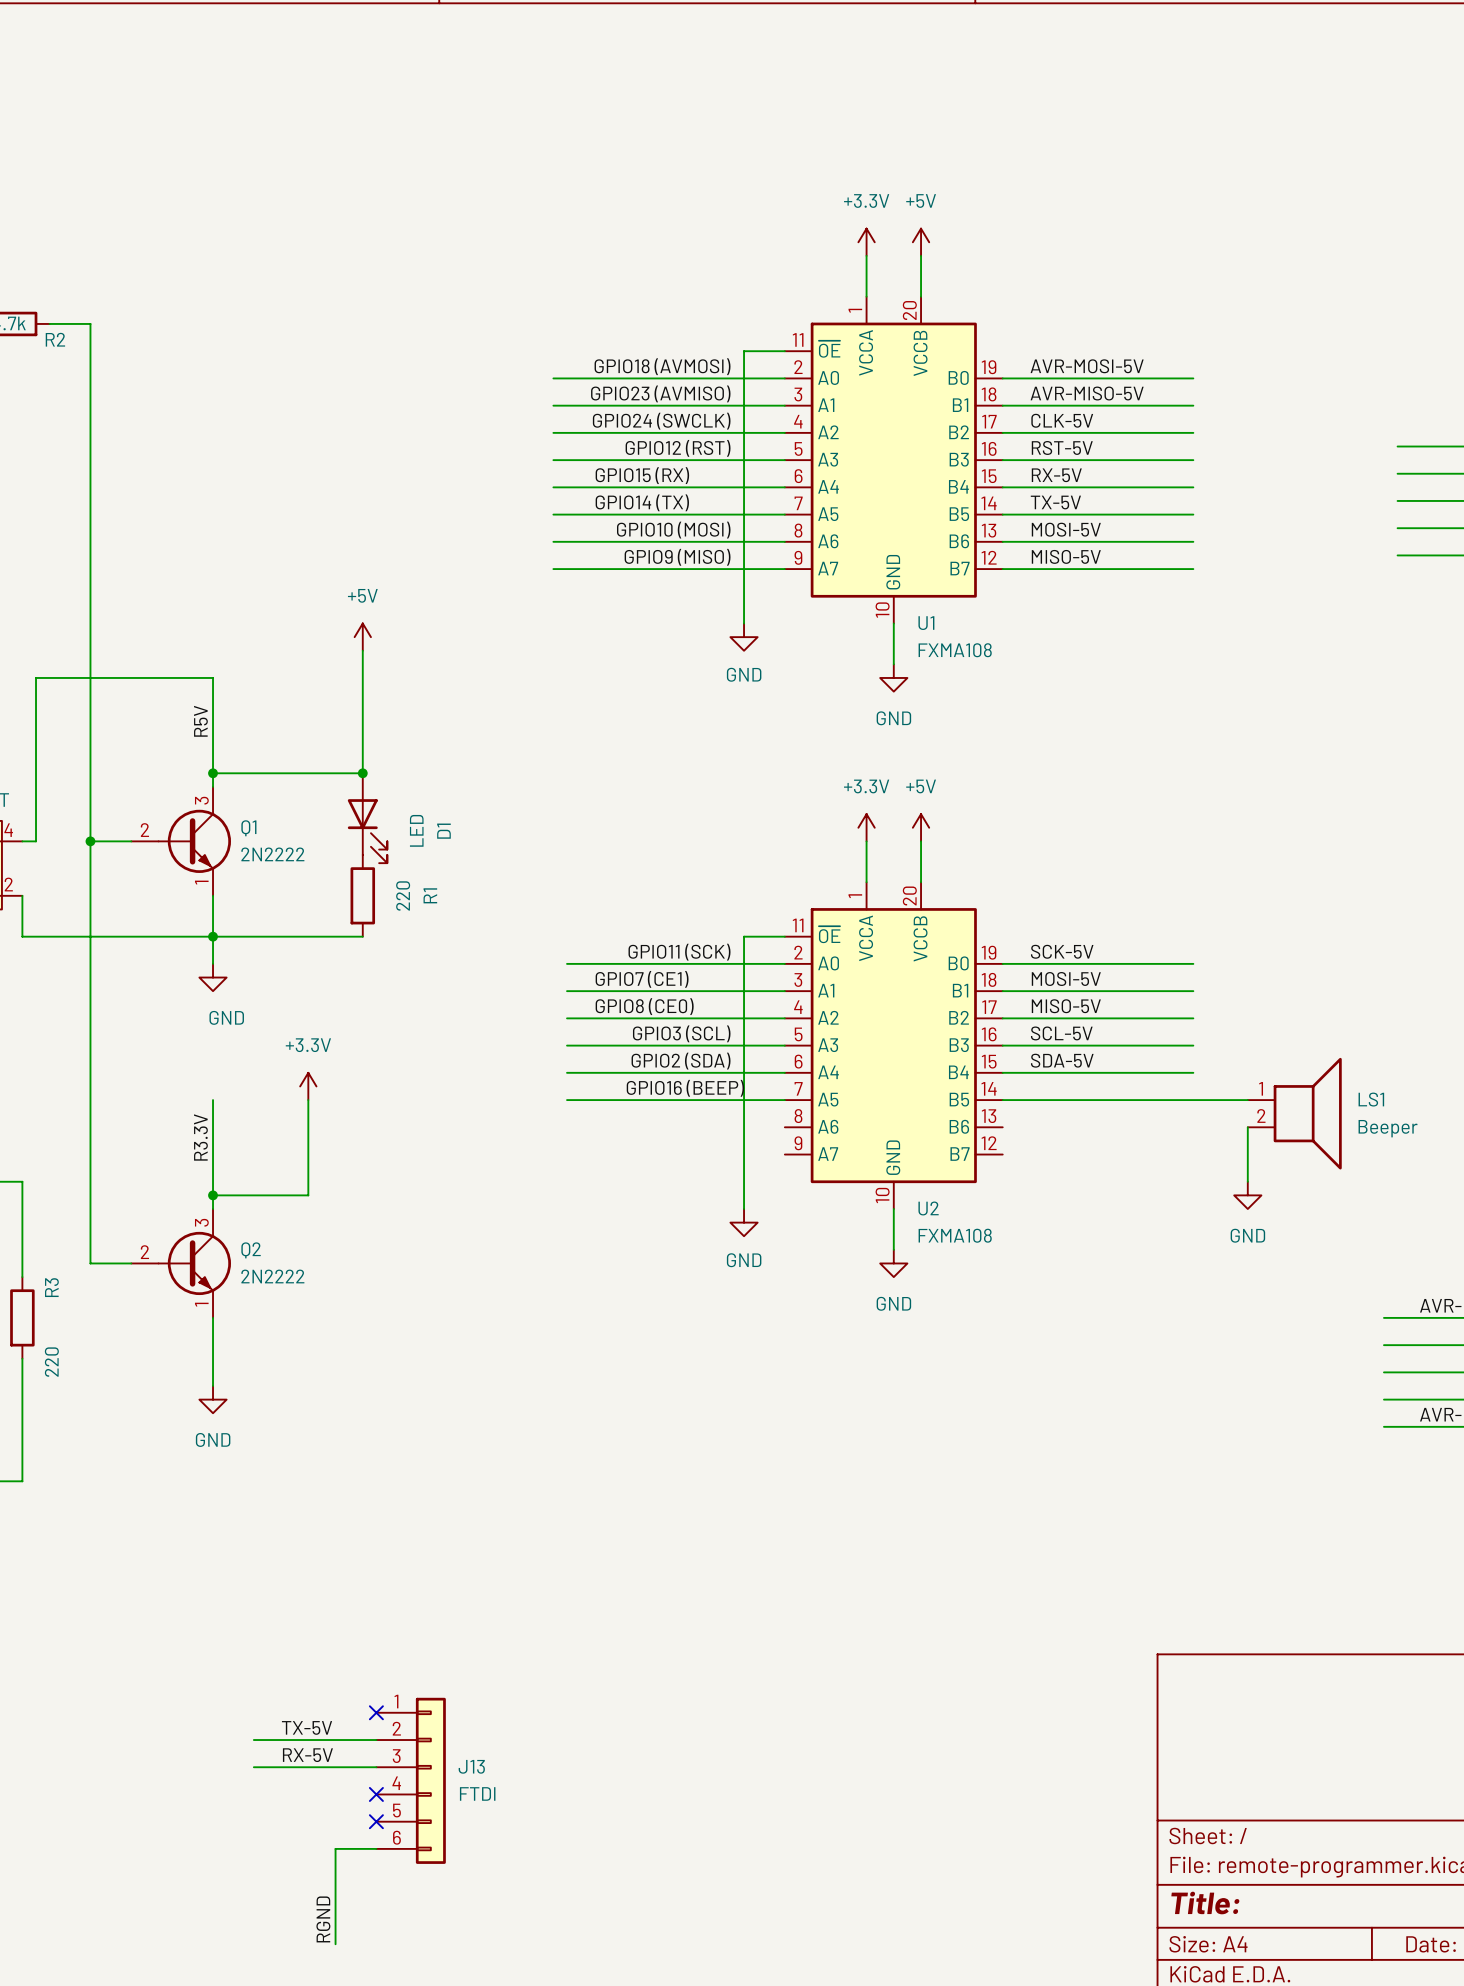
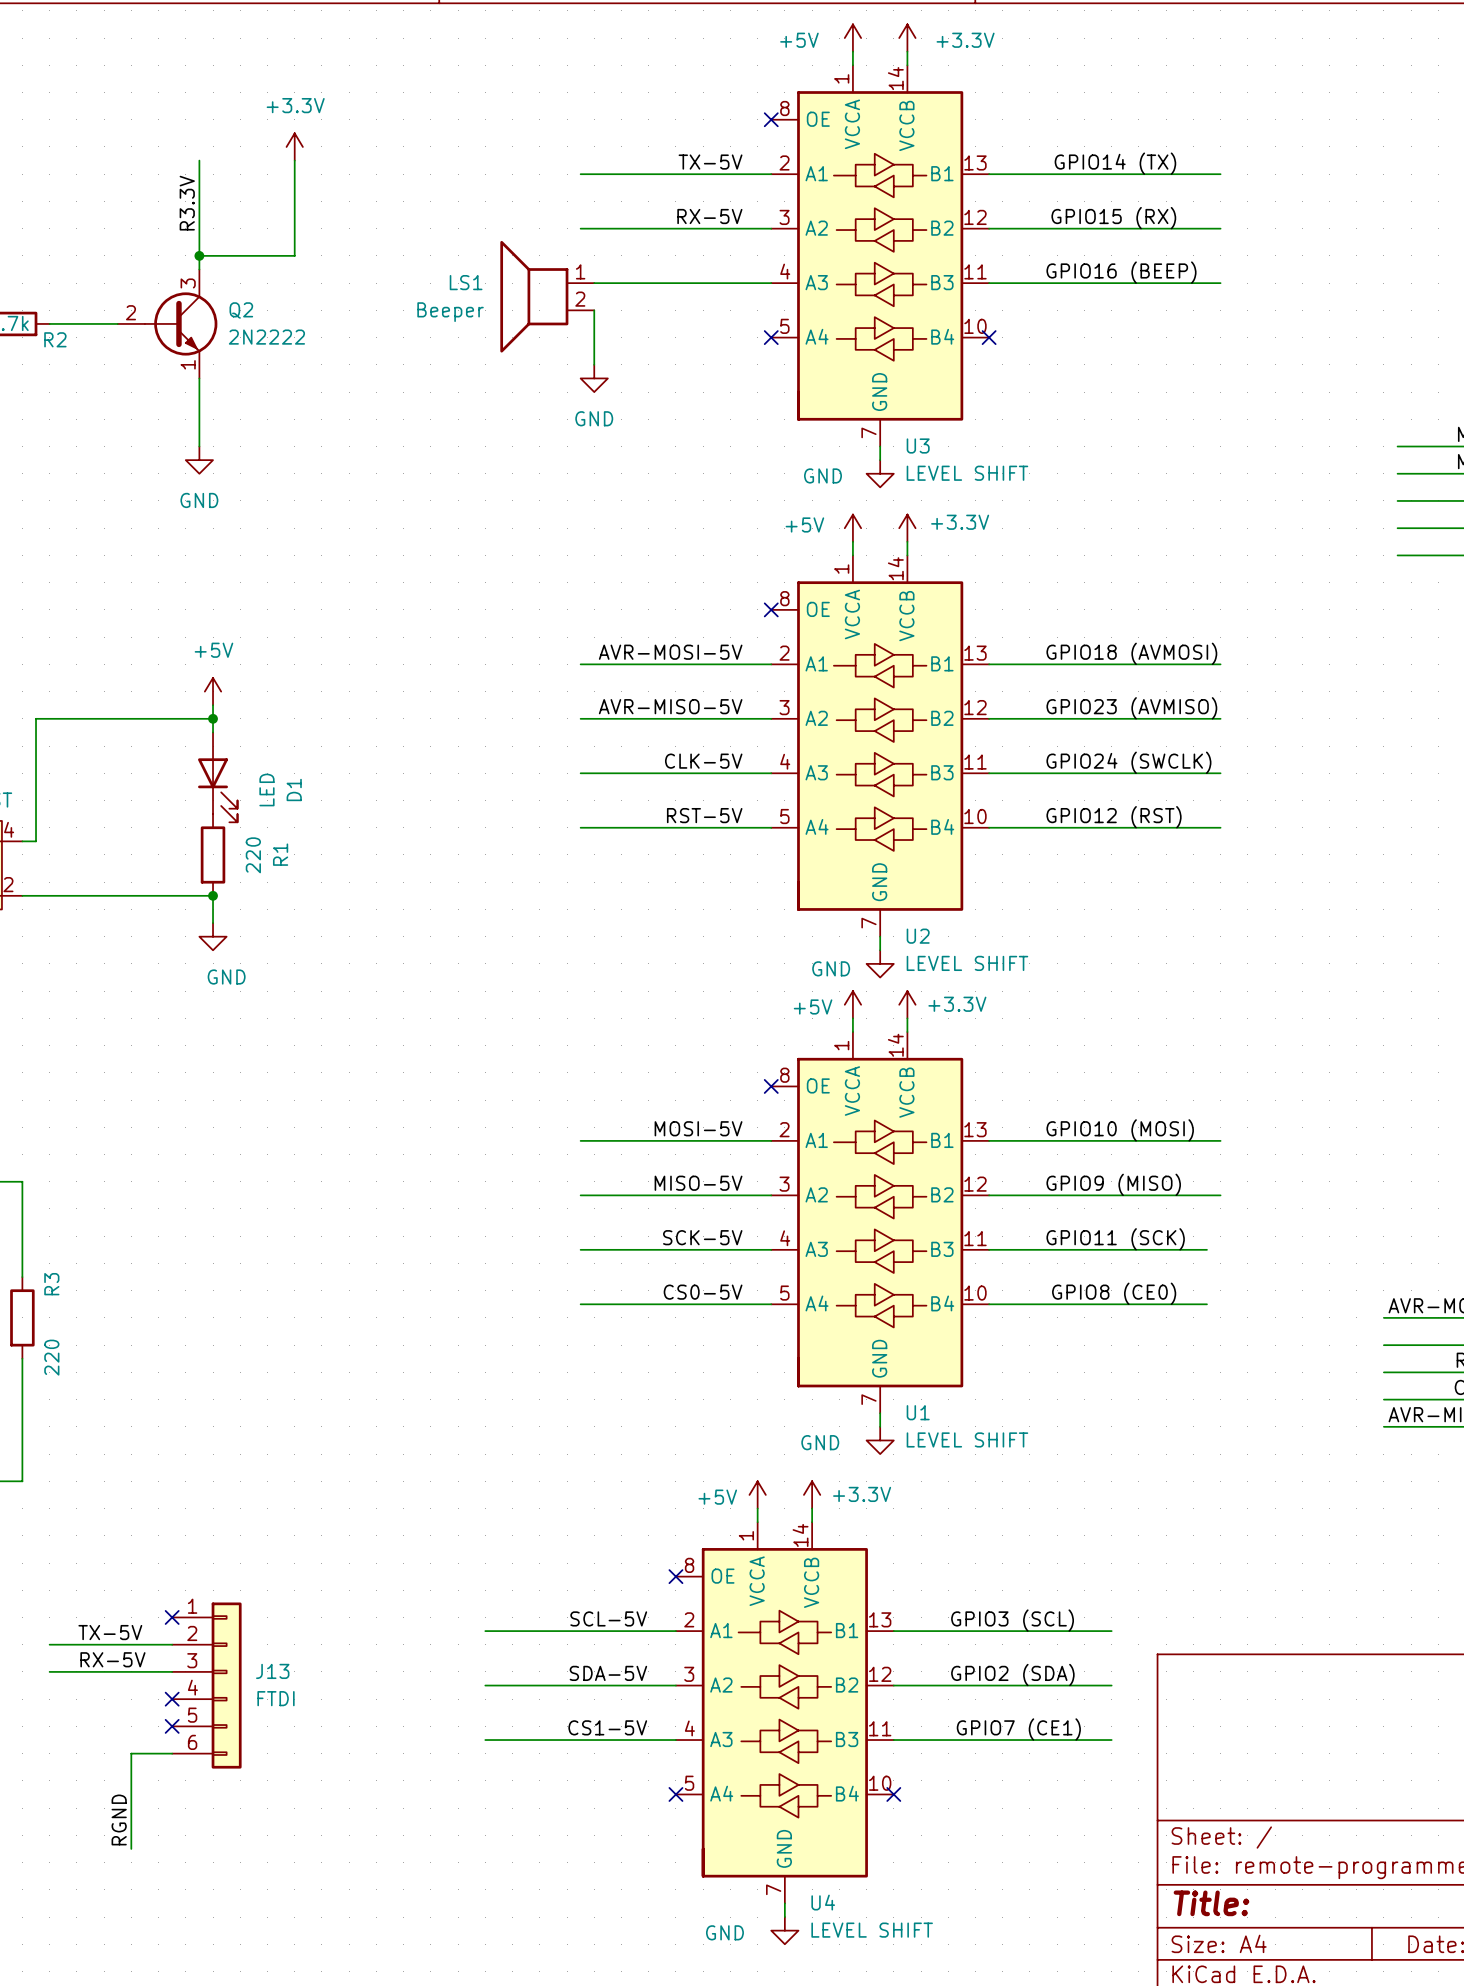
power symbol: none -> +5V (852, 38)
power symbol: none -> +3.3V (907, 38)
wire: none -> (852, 51) (852, 65)
wire: none -> (907, 51) (907, 65)
no-connect mark: none -> (771, 119)
power symbol: none -> +3.3V (294, 146)
wire: none -> (199, 160) (199, 269)
wire: none -> (294, 160) (294, 255) (199, 255)
label: none -> TX-5V (710, 162)
label: none -> GPIO14 (TX) (1115, 163)
wire: none -> (580, 174) (771, 174)
wire: none -> (989, 174) (1220, 174)
label: none -> R3.3V (187, 203)
label: none -> RX-5V (709, 216)
label: none -> GPIO15 (RX) (1113, 218)
wire: none -> (580, 228) (771, 228)
wire: none -> (989, 228) (1220, 228)
power symbol: +3.3V (866, 242) -> none
power symbol: +5V (921, 242) -> none
junction: none -> (199, 255)
U3: none -> LEVEL SHIFT (880, 255)
label: none -> GPIO16 (BEEP) (1121, 272)
wire: none -> (594, 283) (771, 283)
wire: none -> (989, 283) (1220, 283)
U1 symbol: [784, 296, 1003, 624] -> [771, 1031, 990, 1414]
wire: none -> (594, 310) (594, 364)
wire: (90, 323) (90, 1263) (131, 1263) -> (90, 323) (117, 323)
no-connect mark: none -> (771, 337)
no-connect mark: none -> (989, 337)
wire: (784, 351) (744, 351) (744, 623) -> none
label: GPIO18 (AVMOSI) (662, 366) -> none
label: AVR-MOSI-5V (1087, 366) -> none
wire: none -> (199, 378) (199, 446)
wire: (553, 378) (784, 378) -> none
power symbol: none -> GND (594, 378)
wire: (1002, 378) (1193, 378) -> none
label: GPIO23 (AVMISO) (660, 393) -> none
label: AVR-MISO-5V (1087, 393) -> none
wire: (553, 405) (784, 405) -> none
wire: (1002, 405) (1193, 405) -> none
label: CLK-5V (1062, 420) -> none
label: GPIO24 (SWCLK) (661, 421) -> none
wire: (553, 432) (784, 432) -> none
wire: (1002, 432) (1193, 432) -> none
label: RST-5V (1062, 447) -> none
label: GPIO12 (RST) (678, 448) -> none
power symbol: none -> GND (199, 460)
wire: (553, 460) (784, 460) -> none
wire: (1002, 460) (1193, 460) -> none
power symbol: none -> GND (880, 473)
label: GPIO15 (RX) (642, 475) -> none
label: RX-5V (1056, 475) -> none
wire: (553, 487) (784, 487) -> none
wire: (1002, 487) (1193, 487) -> none
label: GPIO14 (TX) (642, 502) -> none
label: TX-5V (1055, 502) -> none
wire: (553, 514) (784, 514) -> none
wire: (1002, 514) (1193, 514) -> none
power symbol: none -> +5V (852, 528)
power symbol: none -> +3.3V (907, 528)
label: MOSI-5V (1066, 529) -> none
label: GPIO10 (MOSI) (673, 530) -> none
wire: (553, 541) (784, 541) -> none
wire: (1002, 541) (1193, 541) -> none
label: MISO-5V (1066, 556) -> none
label: GPIO9 (MISO) (677, 557) -> none
wire: (553, 569) (784, 569) -> none
wire: (1002, 569) (1193, 569) -> none
no-connect mark: none -> (771, 609)
U1 name position: U1 (926, 623) -> U1 (918, 1412)
power symbol position: +5V (362, 637) -> +5V (213, 691)
power symbol: GND (744, 637) -> none
wire: (362, 650) (362, 773) (213, 773) -> none
U1 value: FXMA108 (955, 650) -> LEVEL SHIFT (967, 1439)
label: none -> AVR-MOSI-5V (670, 652)
label: none -> GPIO18 (AVMOSI) (1131, 653)
wire: none -> (580, 664) (771, 664)
wire: none -> (989, 664) (1220, 664)
power symbol: GND (893, 677) -> none
wire: (213, 705) (213, 677) (36, 677) (36, 718) -> (213, 718) (36, 718)
label: none -> AVR-MISO-5V (670, 706)
label: none -> GPIO23 (AVMISO) (1131, 708)
wire: none -> (580, 718) (771, 718)
wire: none -> (989, 718) (1220, 718)
label: R5V (200, 721) -> none
label: none -> CLK-5V (703, 761)
label: none -> GPIO24 (SWCLK) (1128, 762)
junction position: (213, 773) -> (213, 718)
junction: (362, 773) -> none
wire: none -> (580, 773) (771, 773)
wire: none -> (989, 773) (1220, 773)
label: none -> RST-5V (704, 815)
label: none -> GPIO12 (RST) (1114, 817)
D1 position: (367, 818) -> (217, 777)
wire: none -> (580, 827) (771, 827)
power symbol: +3.3V (866, 827) -> none
power symbol: +5V (921, 827) -> none
wire: none -> (989, 827) (1220, 827)
wire: (90, 841) (131, 841) -> none
junction: (90, 841) -> none
Q1: 2N2222 (181, 841) -> none
U2 symbol: [784, 882, 1003, 1209] -> [771, 555, 990, 937]
wire: (22, 895) (22, 936) (362, 936) -> (22, 895) (213, 895)
R1 position: (362, 895) -> (213, 854)
wire: (213, 923) (213, 963) -> none
junction position: (213, 936) -> (213, 895)
wire: (784, 936) (744, 936) (744, 1208) -> none
label: SCK-5V (1062, 951) -> none
label: GPIO11 (SCK) (679, 952) -> none
wire: (567, 963) (784, 963) -> none
power symbol: none -> GND (880, 963)
wire: (1002, 963) (1193, 963) -> none
power symbol position: GND (213, 977) -> GND (213, 936)
label: MOSI-5V (1066, 978) -> none
label: GPIO7 (CE1) (642, 979) -> none
wire: (567, 991) (784, 991) -> none
wire: (1002, 991) (1193, 991) -> none
power symbol: none -> +5V (852, 1004)
power symbol: none -> +3.3V (907, 1004)
label: GPIO8 (CE0) (644, 1006) -> none
label: MISO-5V (1066, 1006) -> none
wire: (567, 1018) (784, 1018) -> none
wire: (1002, 1018) (1193, 1018) -> none
label: GPIO3 (SCL) (681, 1033) -> none
label: SCL-5V (1061, 1033) -> none
wire: (567, 1045) (784, 1045) -> none
wire: (1002, 1045) (1193, 1045) -> none
label: SDA-5V (1062, 1060) -> none
label: GPIO2 (SDA) (681, 1061) -> none
wire: (567, 1072) (784, 1072) -> none
wire: (1002, 1072) (1193, 1072) -> none
power symbol: +3.3V (308, 1086) -> none
no-connect mark: none -> (771, 1086)
label: GPIO16 (BEEP) (685, 1088) -> none
wire: (213, 1100) (213, 1208) -> none
wire: (308, 1100) (308, 1195) (213, 1195) -> none
wire: (567, 1100) (784, 1100) -> none
wire: (1002, 1100) (1247, 1100) -> none
LS1 position: (1294, 1113) -> (547, 296)
LS1 flip: as is (1307, 1113) -> left-right (534, 296)
wire: (1247, 1127) (1247, 1181) -> none
label: none -> MOSI-5V (698, 1128)
label: none -> GPIO10 (MOSI) (1120, 1130)
label: R3.3V (200, 1137) -> none
wire: none -> (580, 1140) (771, 1140)
wire: none -> (989, 1140) (1220, 1140)
label: none -> MISO-5V (698, 1183)
label: none -> GPIO9 (MISO) (1113, 1184)
junction: (213, 1195) -> none
wire: none -> (580, 1195) (771, 1195)
wire: none -> (989, 1195) (1220, 1195)
power symbol: GND (1247, 1195) -> none
U2 name position: U2 (928, 1208) -> U2 (918, 936)
power symbol: GND (744, 1222) -> none
U2 value: FXMA108 (955, 1235) -> LEVEL SHIFT (967, 963)
label: none -> SCK-5V (702, 1237)
label: none -> GPIO11 (SCK) (1115, 1239)
wire: none -> (580, 1249) (771, 1249)
wire: none -> (989, 1249) (1206, 1249)
Q2 position: (181, 1263) -> (167, 323)
power symbol: GND (893, 1263) -> none
label: none -> CS0-5V (703, 1292)
label: none -> GPIO8 (CE0) (1114, 1293)
wire: none -> (580, 1304) (771, 1304)
wire: none -> (989, 1304) (1206, 1304)
wire: (213, 1317) (213, 1386) -> none
power symbol: GND (213, 1399) -> none
wire: none -> (880, 1413) (880, 1426)
power symbol: none -> GND (880, 1440)
power symbol: none -> +5V (757, 1494)
power symbol: none -> +3.3V (812, 1494)
wire: none -> (757, 1508) (757, 1522)
wire: none -> (812, 1508) (812, 1522)
no-connect mark: none -> (675, 1576)
no-connect mark: none -> (172, 1617)
label: none -> SCL-5V (608, 1618)
label: none -> GPIO3 (SCL) (1012, 1620)
wire: none -> (485, 1631) (675, 1631)
wire: none -> (893, 1631) (1111, 1631)
label: none -> SDA-5V (608, 1673)
label: none -> GPIO2 (SDA) (1012, 1675)
wire: none -> (485, 1685) (675, 1685)
wire: none -> (893, 1685) (1111, 1685)
no-connect mark: none -> (172, 1699)
no-connect mark: (376, 1712) -> none
U4: none -> LEVEL SHIFT (784, 1712)
no-connect mark: none -> (172, 1726)
label position: TX-5V (307, 1727) -> TX-5V (110, 1632)
label: none -> CS1-5V (607, 1727)
label: none -> GPIO7 (CE1) (1018, 1729)
wire: (253, 1740) (376, 1740) -> (49, 1644) (172, 1644)
wire: none -> (485, 1740) (675, 1740)
wire: none -> (893, 1740) (1111, 1740)
label position: RX-5V (307, 1755) -> RX-5V (112, 1659)
wire: (253, 1767) (376, 1767) -> (49, 1671) (172, 1671)
J13 position: (411, 1780) -> (206, 1685)
no-connect mark: (376, 1794) -> none
no-connect mark: none -> (675, 1794)
no-connect mark: none -> (893, 1794)
no-connect mark: (376, 1821) -> none
wire: (376, 1848) (335, 1848) (335, 1944) -> (172, 1753) (131, 1753) (131, 1848)
wire: none -> (784, 1903) (784, 1917)
label position: RGND (323, 1919) -> RGND (119, 1819)
power symbol: none -> GND (784, 1930)

